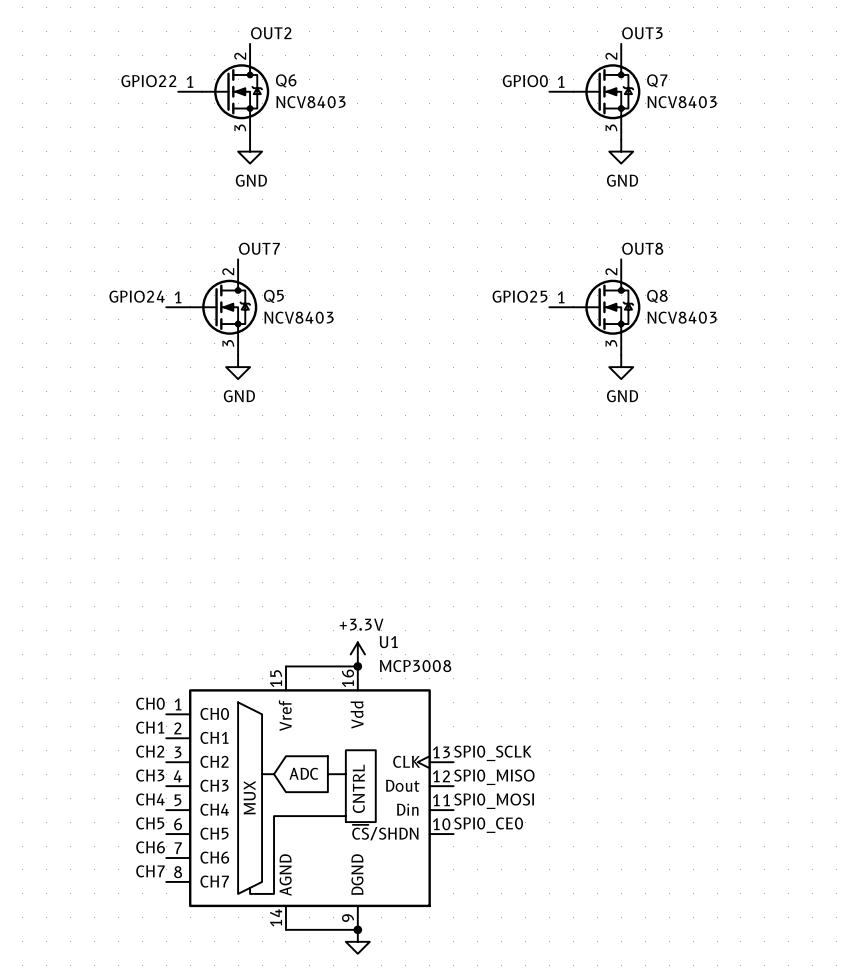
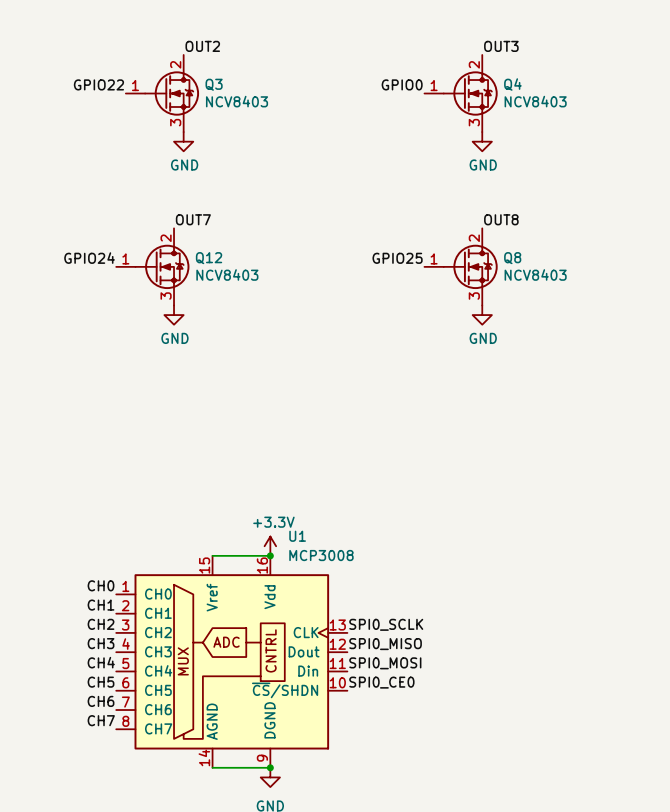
Q6 name: Q6 (286, 80) -> Q3 (214, 84)
Q7 name: Q7 (657, 80) -> Q4 (512, 84)
Q5 name: Q5 (273, 296) -> Q12 (209, 258)

